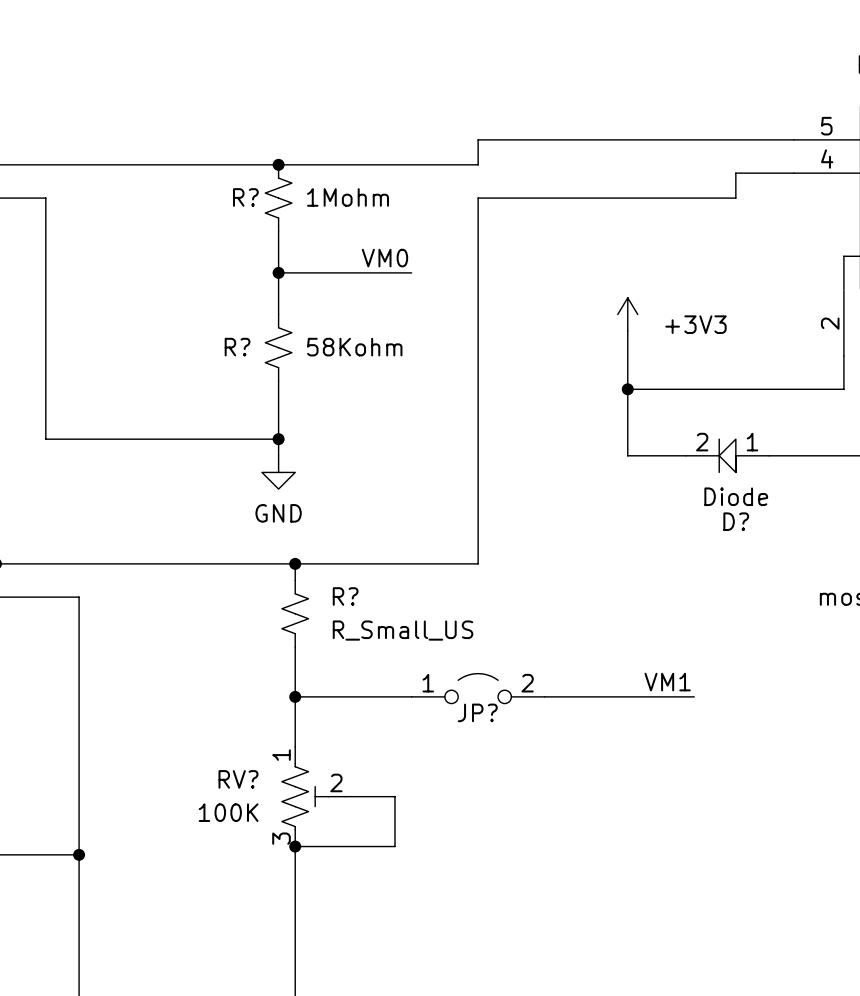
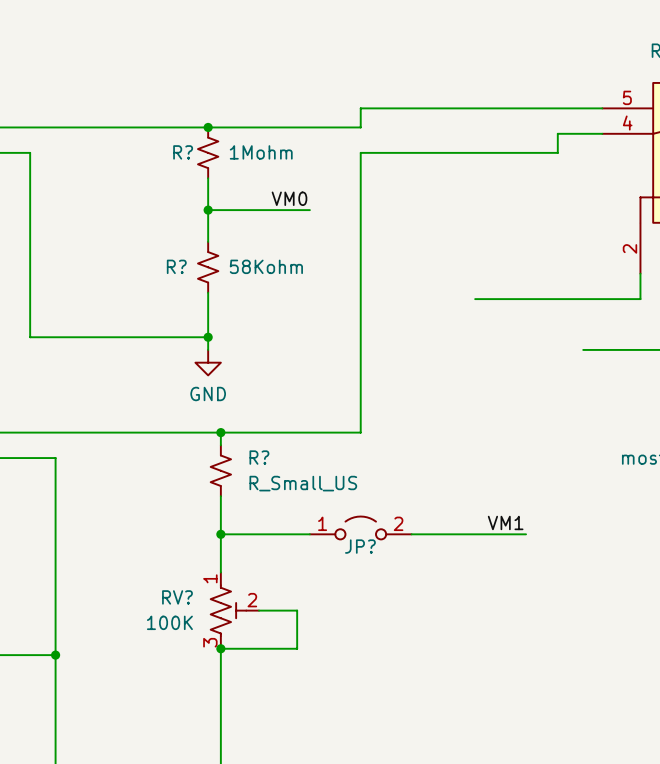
power symbol: +3V3 (627, 314) -> none
wire: (627, 331) (627, 455) (685, 455) -> none
junction: (627, 389) -> none
D?: Diode (727, 455) -> none

